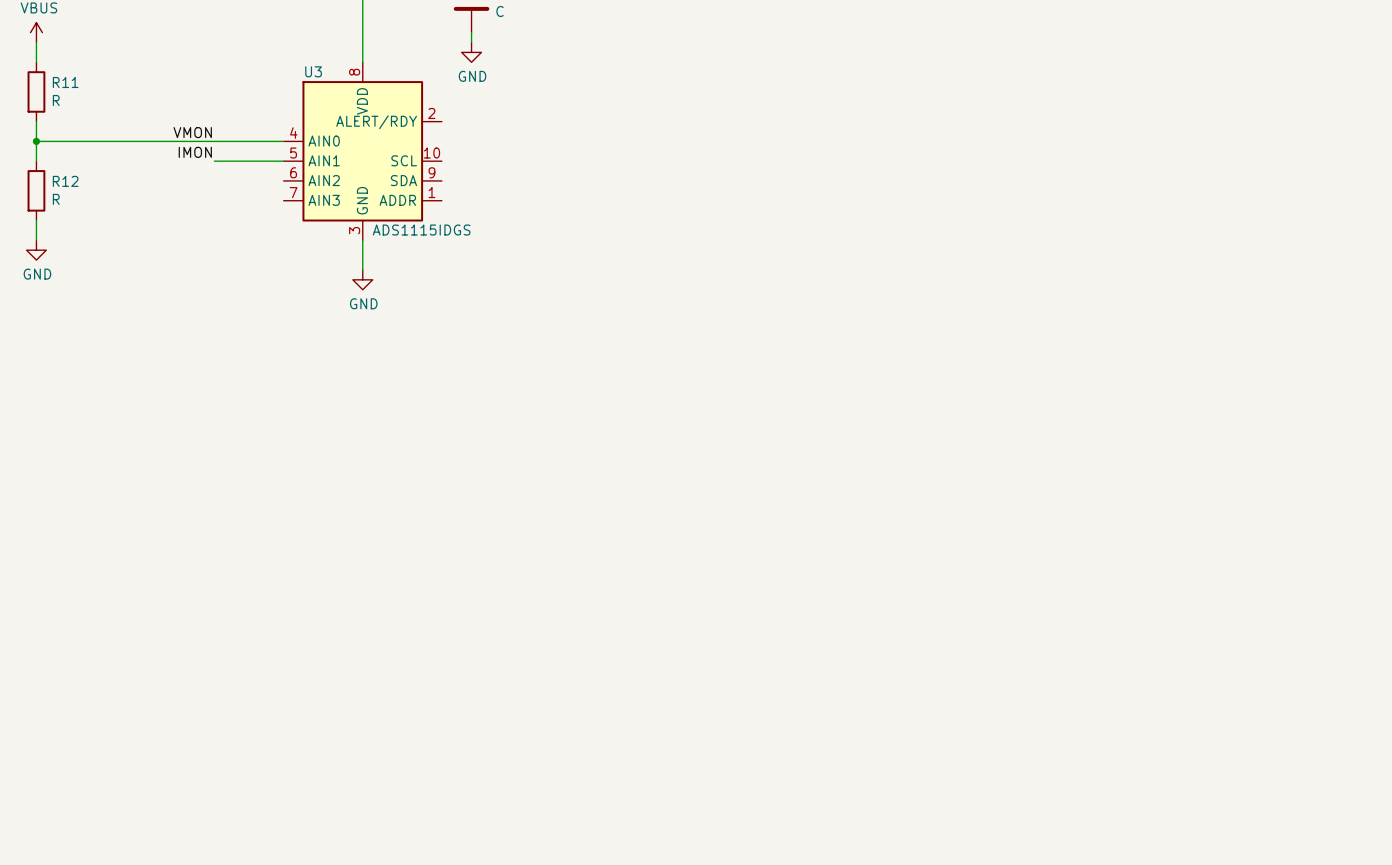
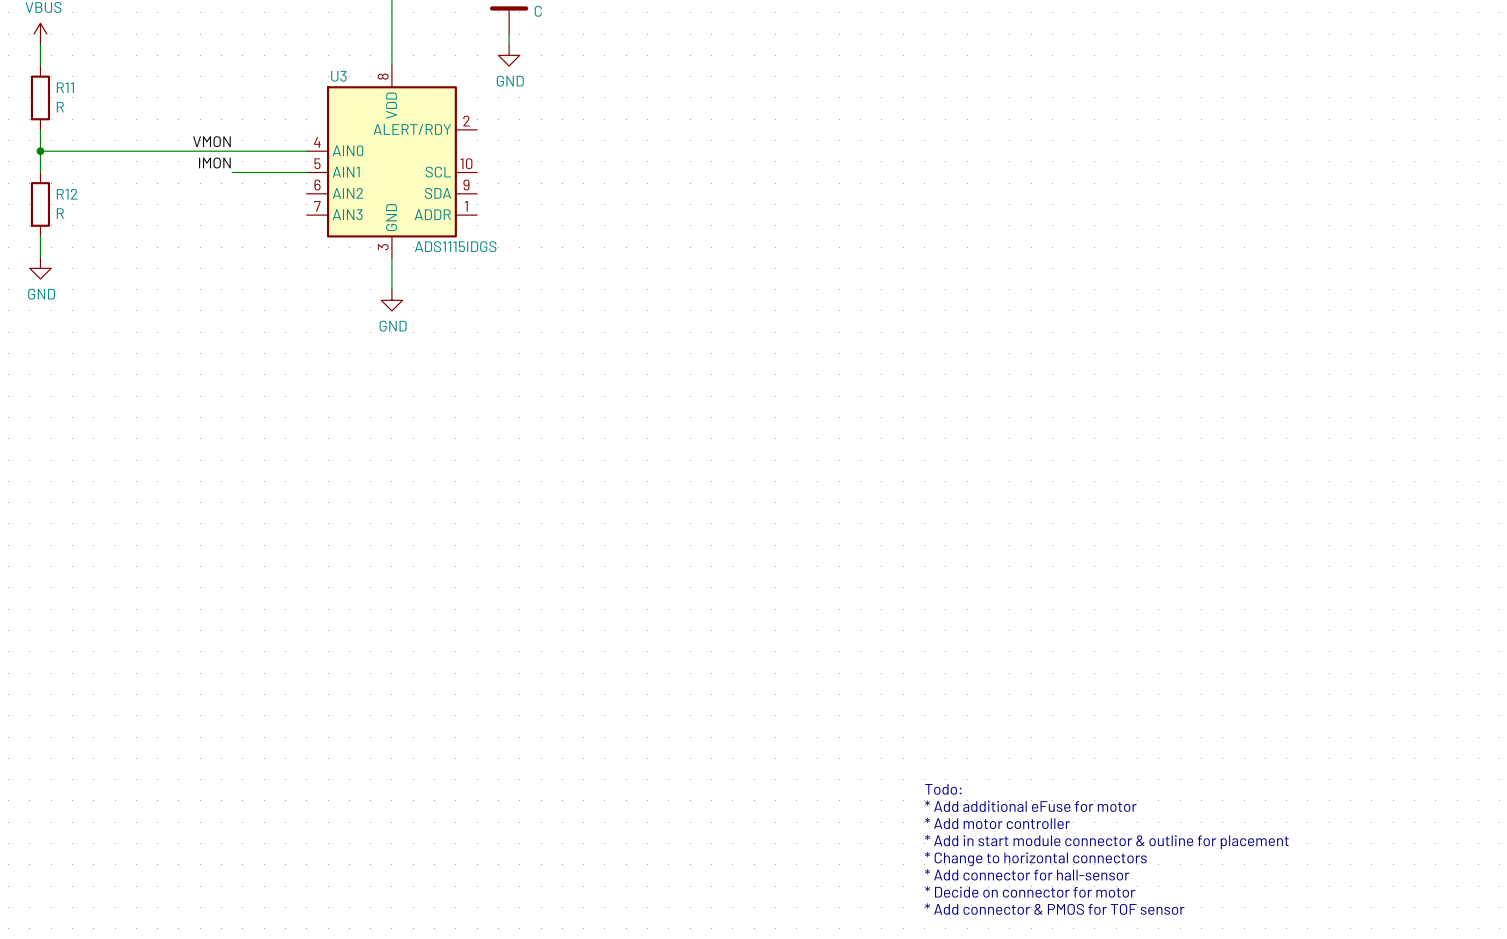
text: none -> Todo: (943, 789)
text: none -> * Add additional eFuse for motor (1030, 806)
text: none -> * Add motor controller (997, 823)
text: none -> * Add in start module connector & outline for placement (1106, 841)
text: none -> * Change to horizontal connectors (1035, 859)
text: none -> * Add connector for hall-sensor (1027, 874)
text: none -> * Decide on connector for motor (1030, 891)
text: none -> * Add connector & PMOS for TOF sensor (1054, 909)

